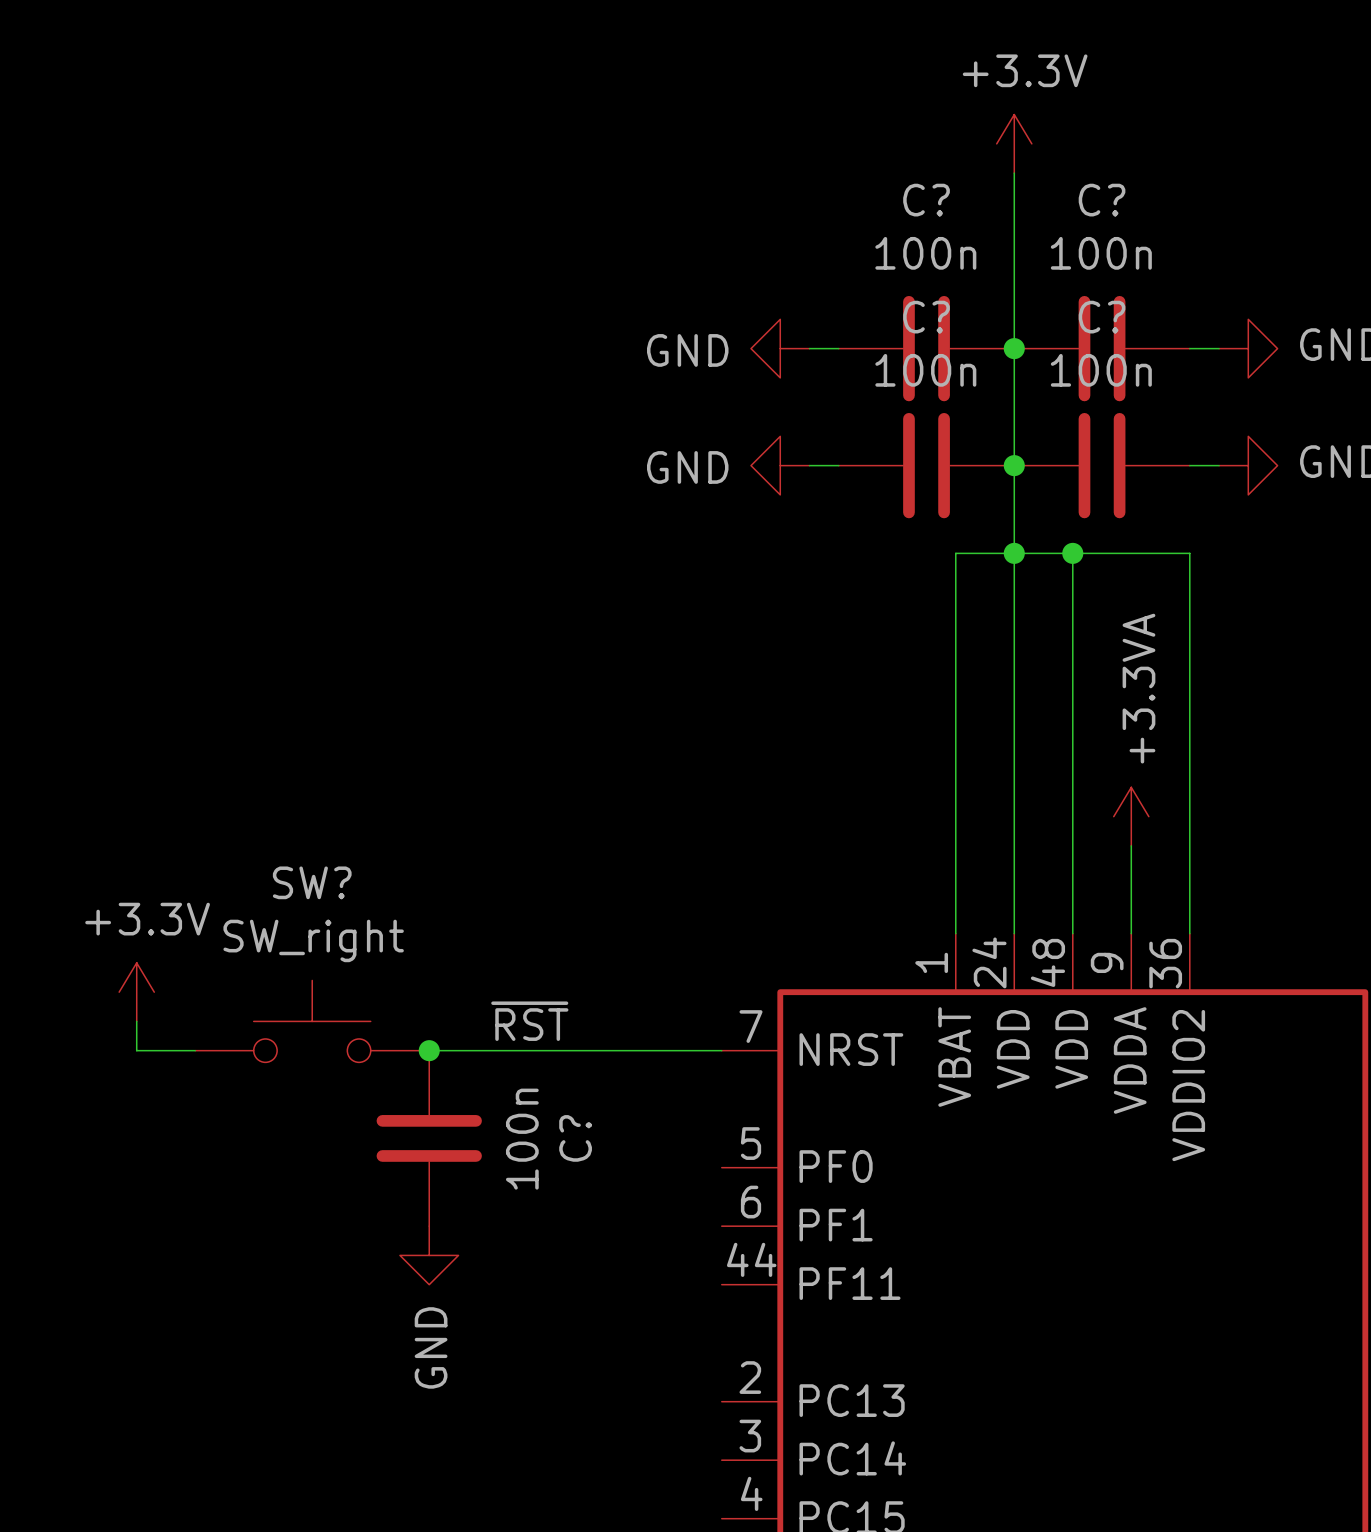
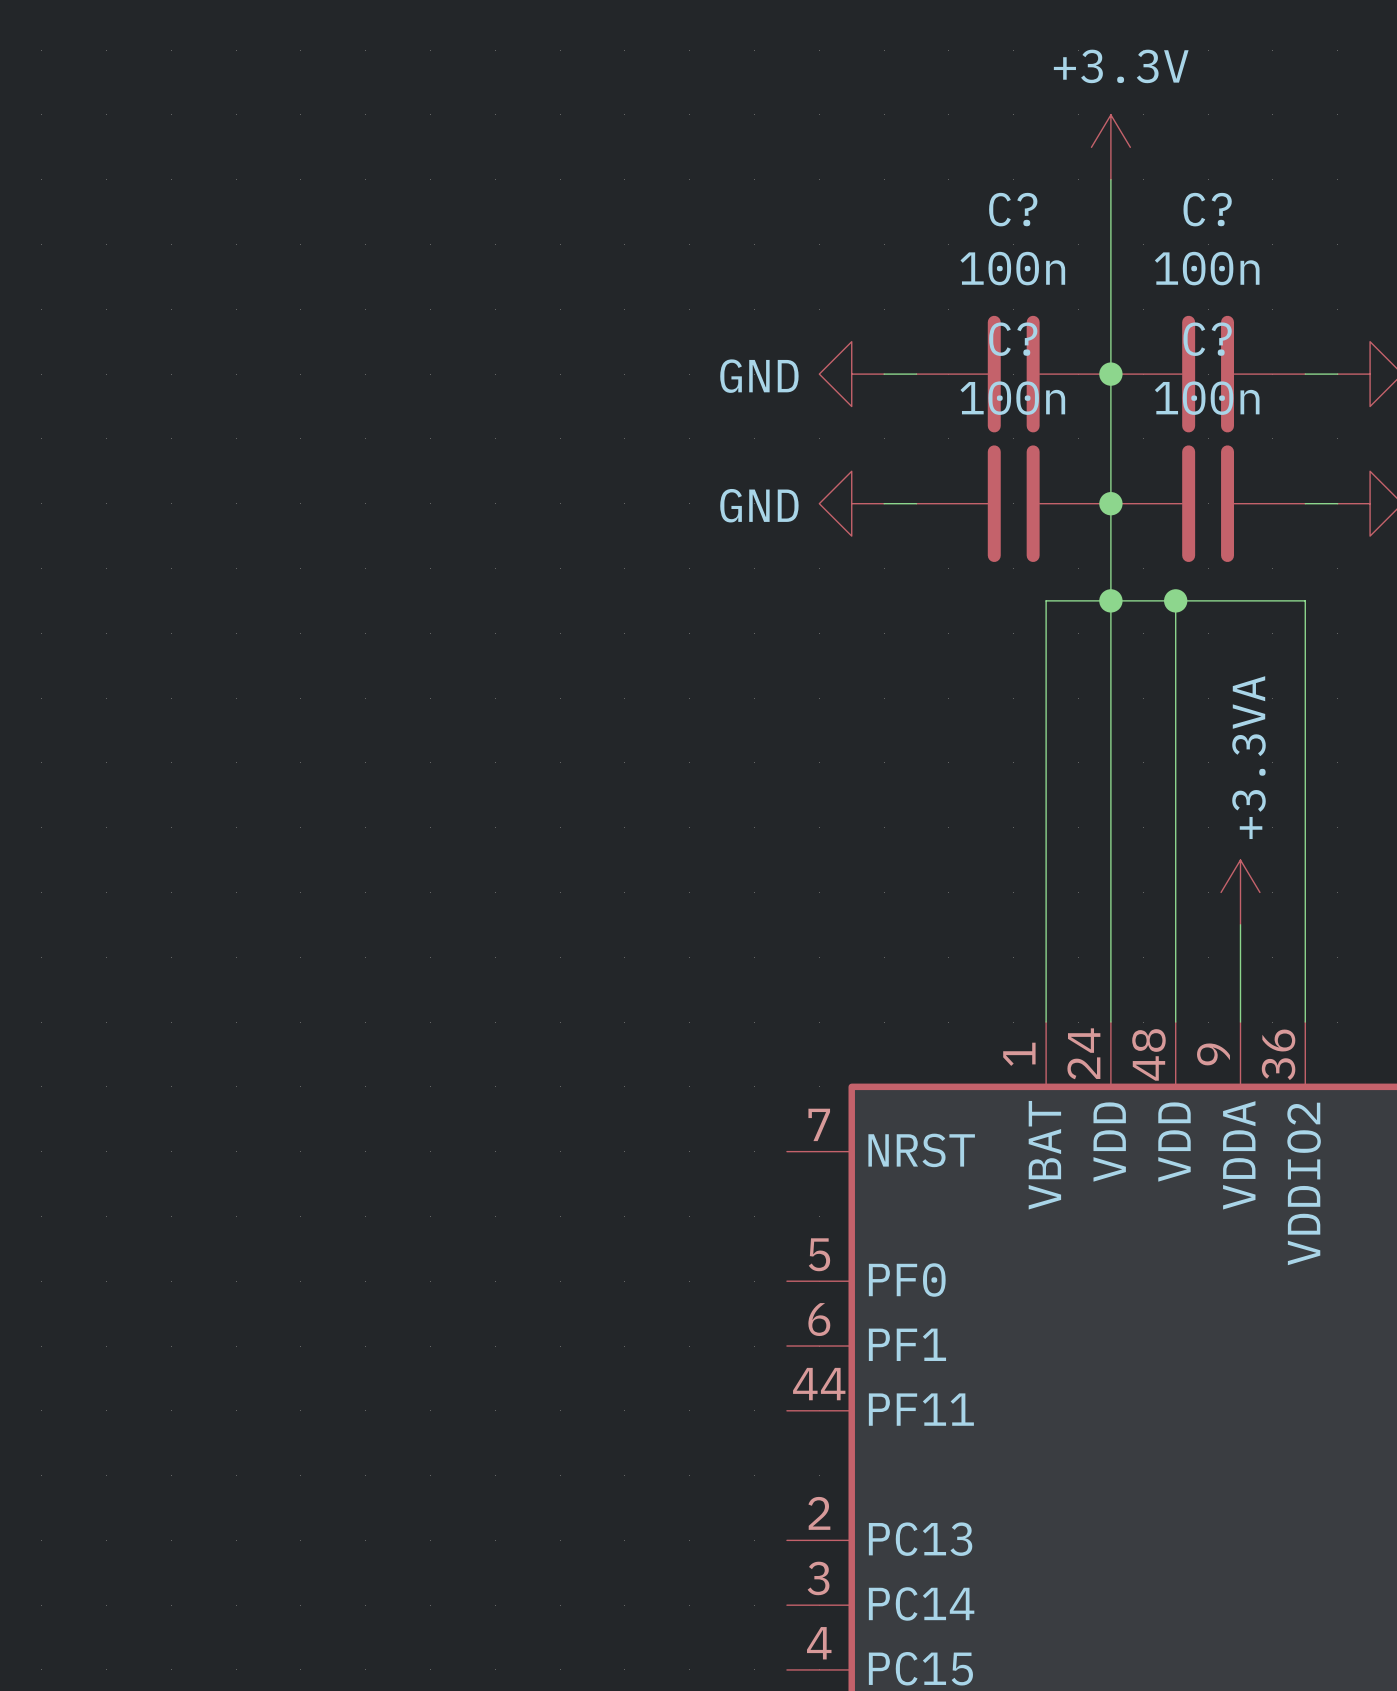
power symbol: +3.3V (136, 992) -> none
wire: (136, 1021) (136, 1050) (195, 1050) -> none
SW?: SW_right (312, 1021) -> none
label: ~{RST} (529, 1021) -> none
wire: (429, 1050) (721, 1050) -> none
junction: (429, 1050) -> none
C?: 100n (429, 1138) -> none
power symbol: GND (429, 1255) -> none

